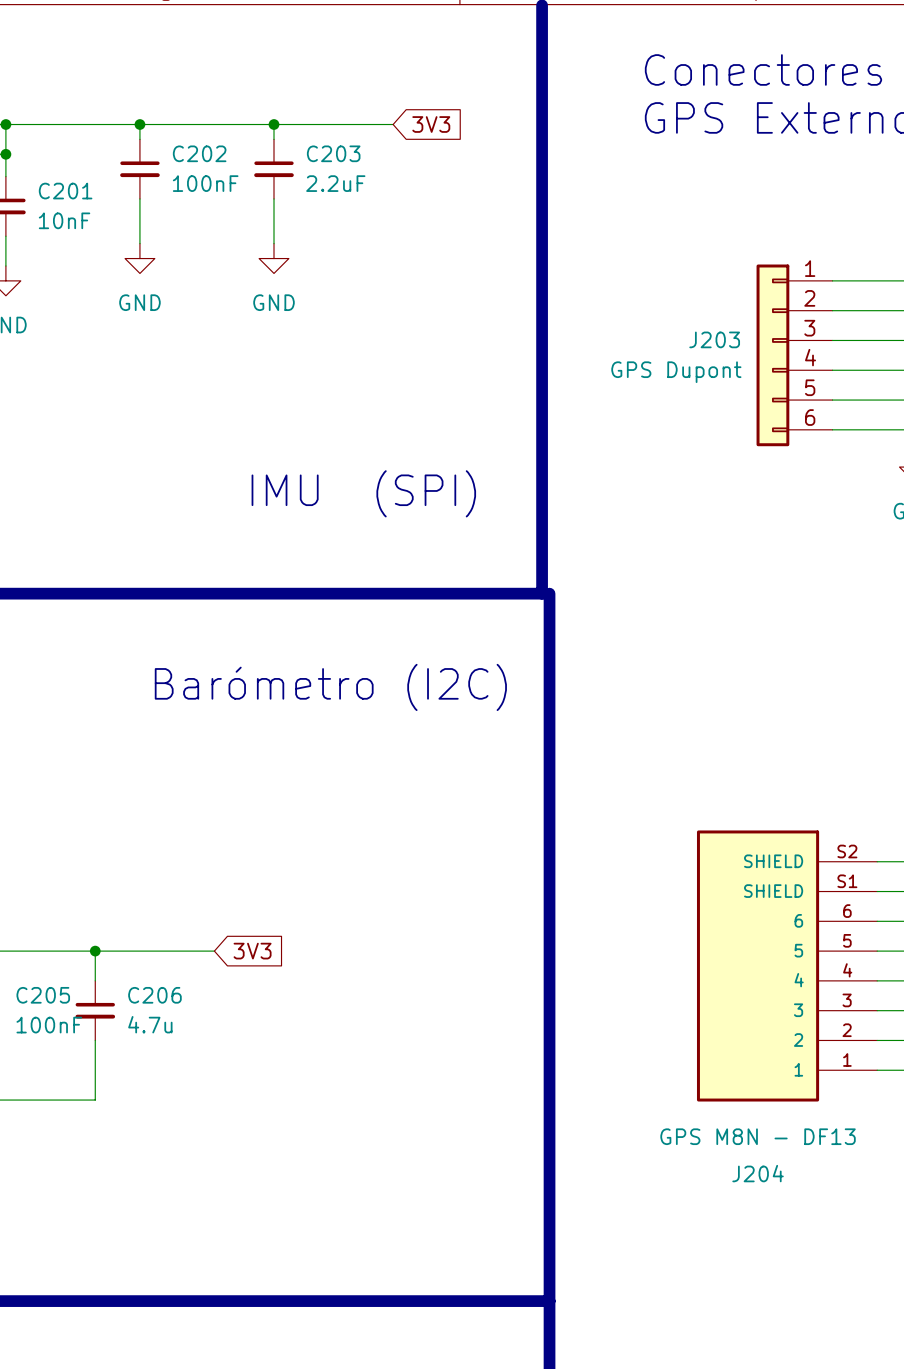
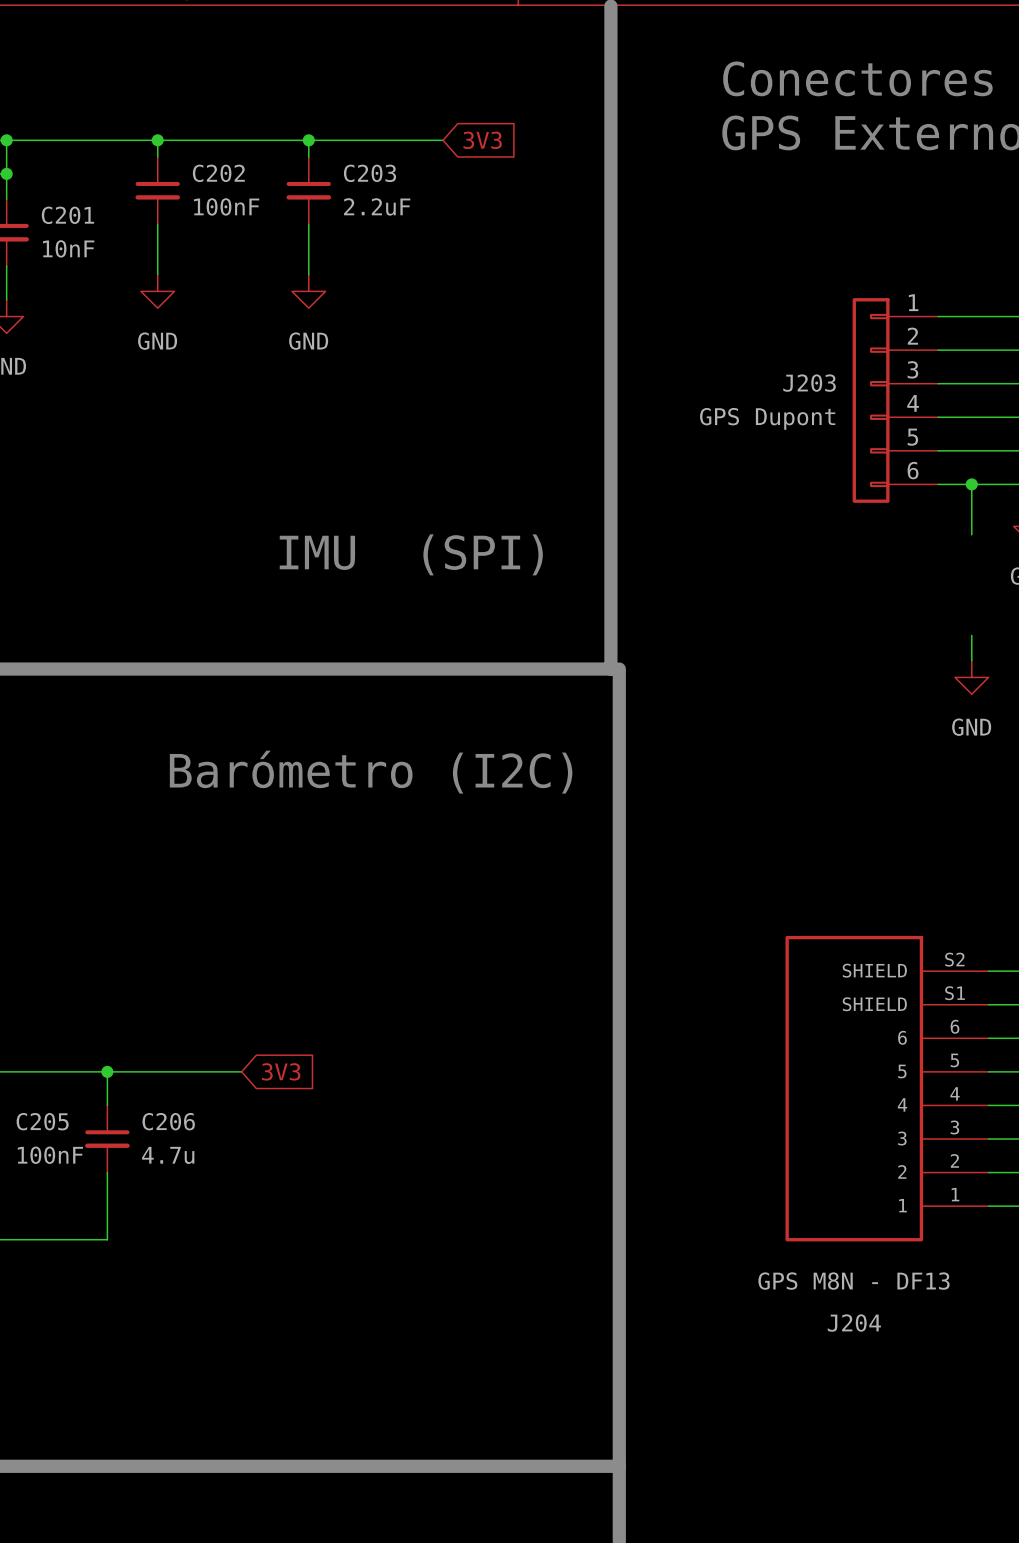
wire: none -> (971, 484) (971, 534)
junction: none -> (971, 484)
wire: none -> (971, 635) (971, 660)
power symbol: none -> GND (971, 677)

